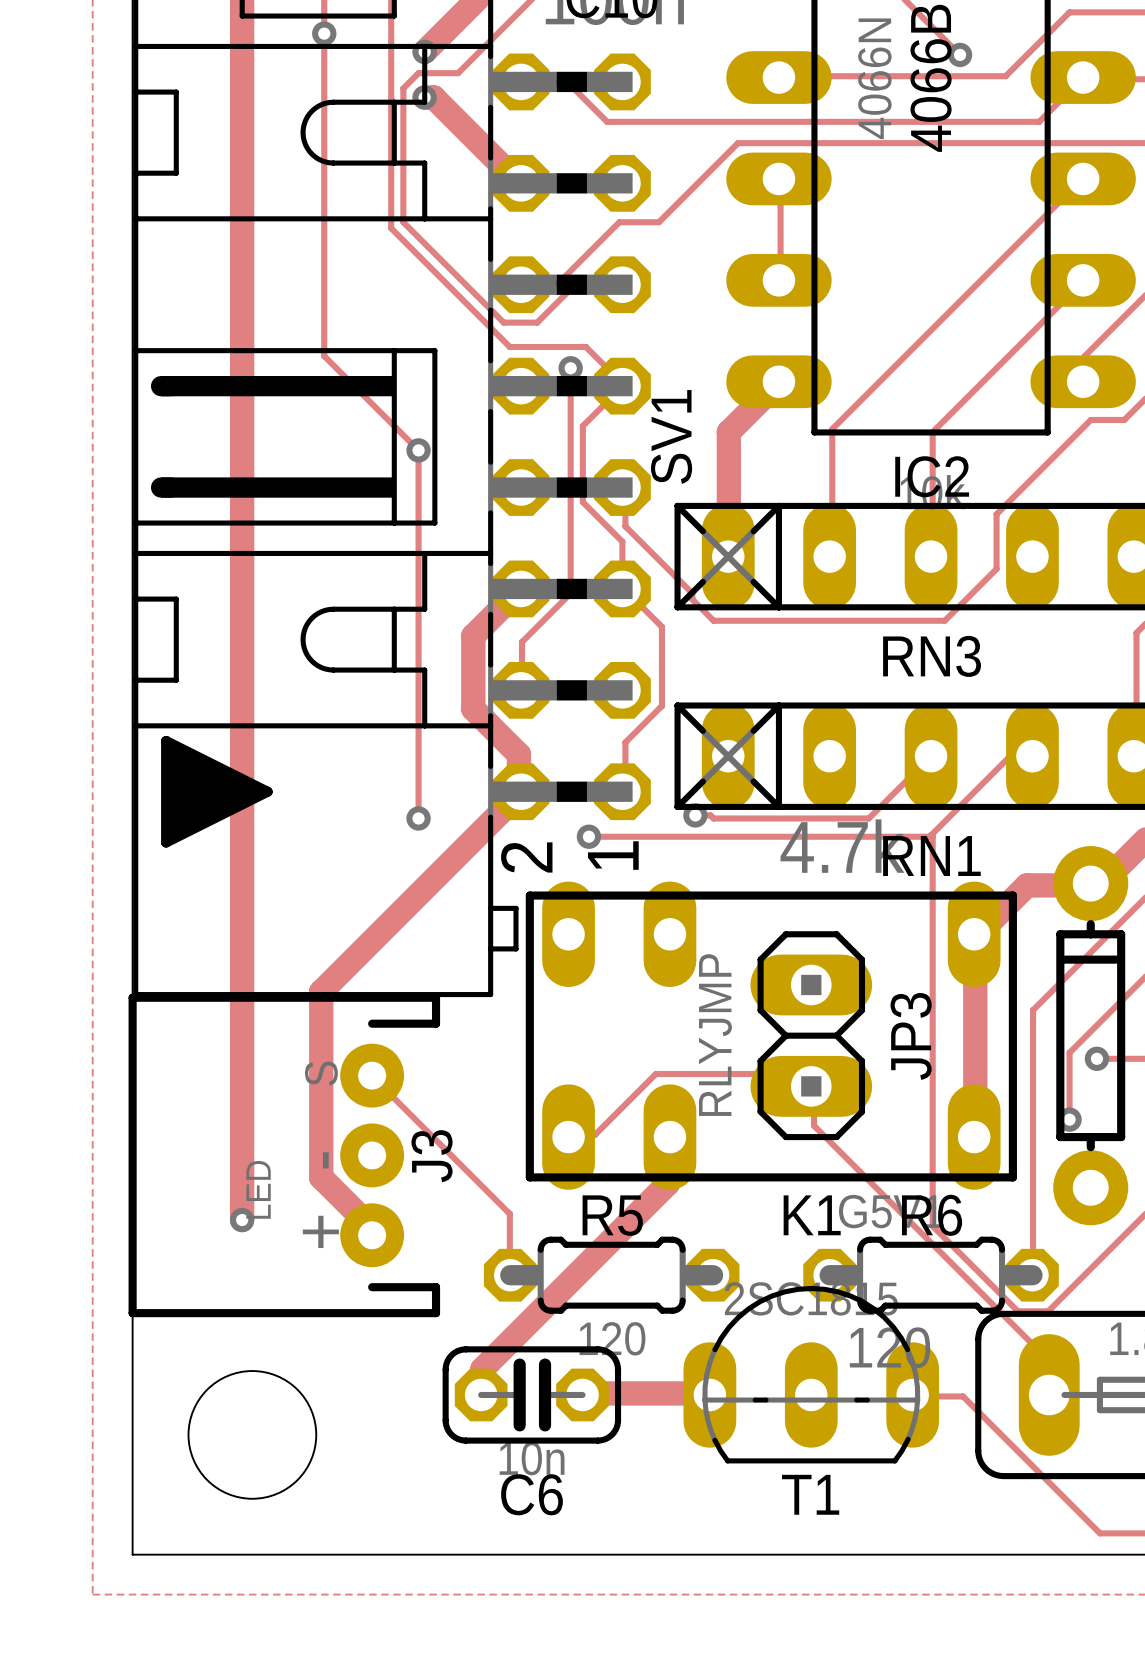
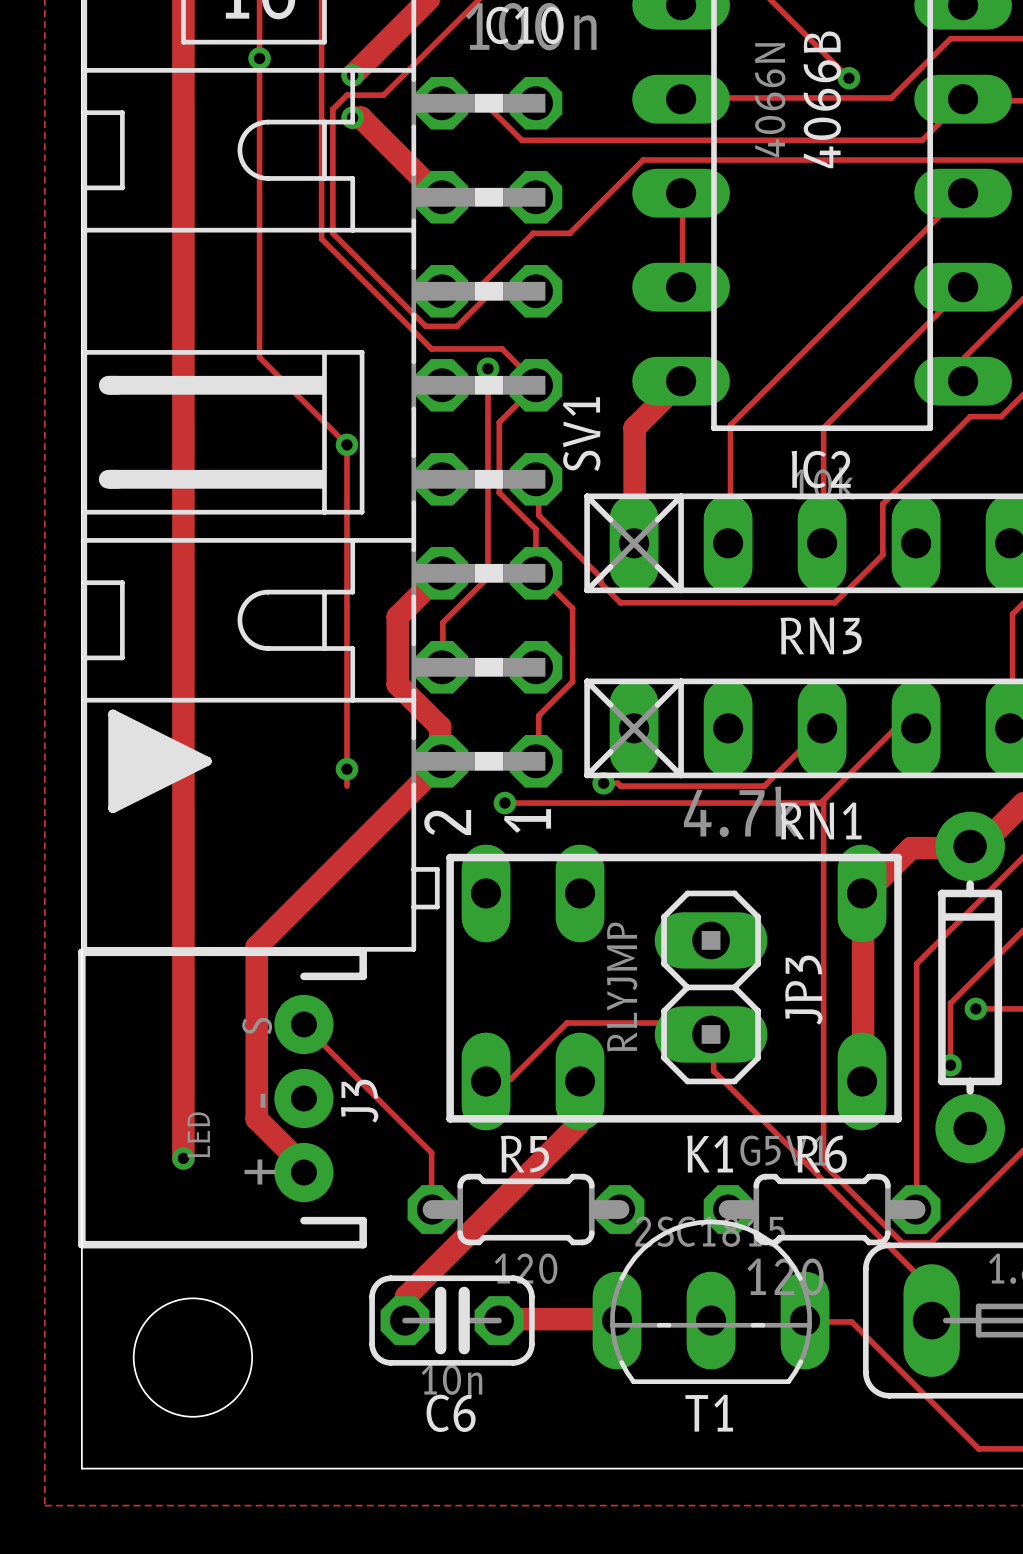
via position: (418, 818) -> (346, 769)

